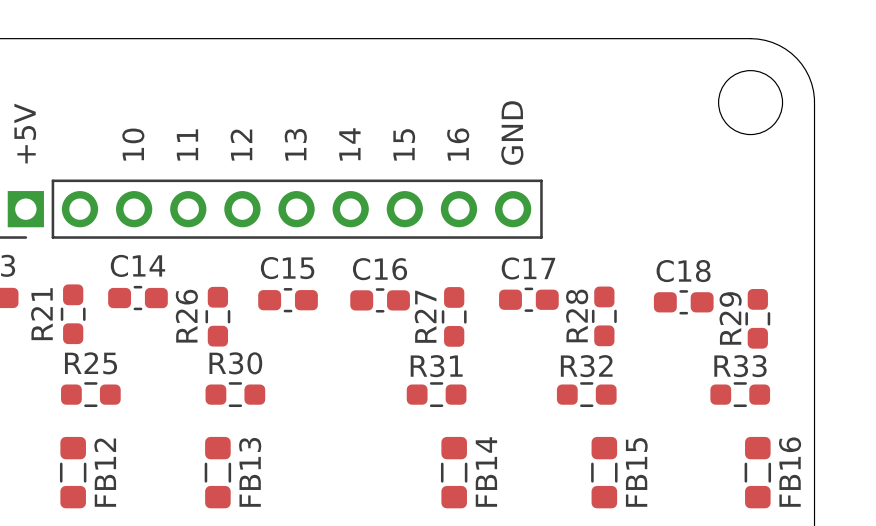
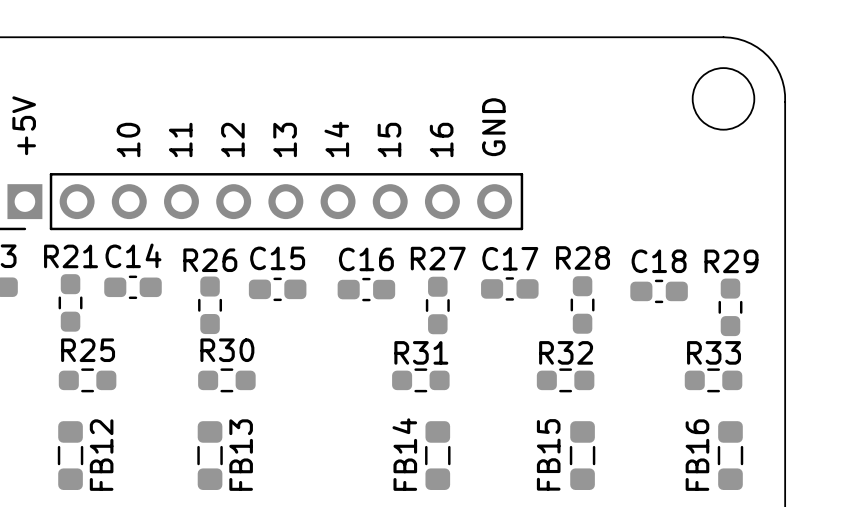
R21 name rotation: 0° (41, 314) -> 90° clockwise (71, 256)
R28 name rotation: 0° (577, 315) -> 90° clockwise (583, 257)
R26 name rotation: 0° (186, 316) -> 90° clockwise (210, 260)
R27 name rotation: 0° (425, 316) -> 90° clockwise (438, 258)
R29 name rotation: 0° (730, 318) -> 90° clockwise (731, 261)
FB14 name position: FB14 (486, 472) -> FB14 (404, 454)
FB15 name position: FB15 (636, 472) -> FB15 (548, 454)
FB16 name position: FB16 (790, 472) -> FB16 (697, 455)

